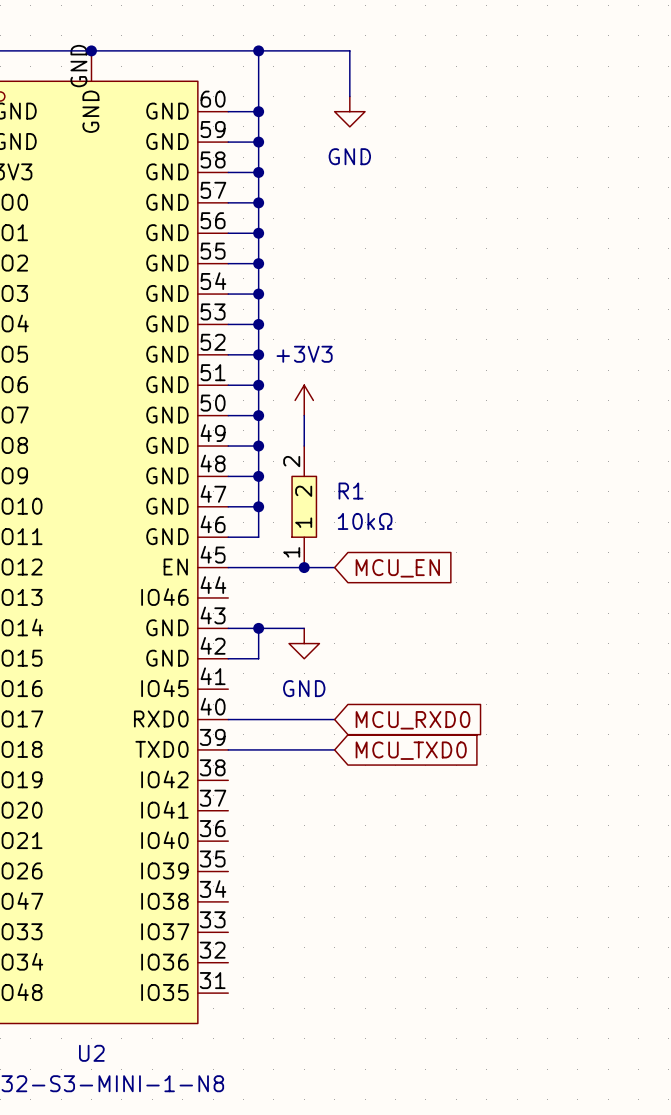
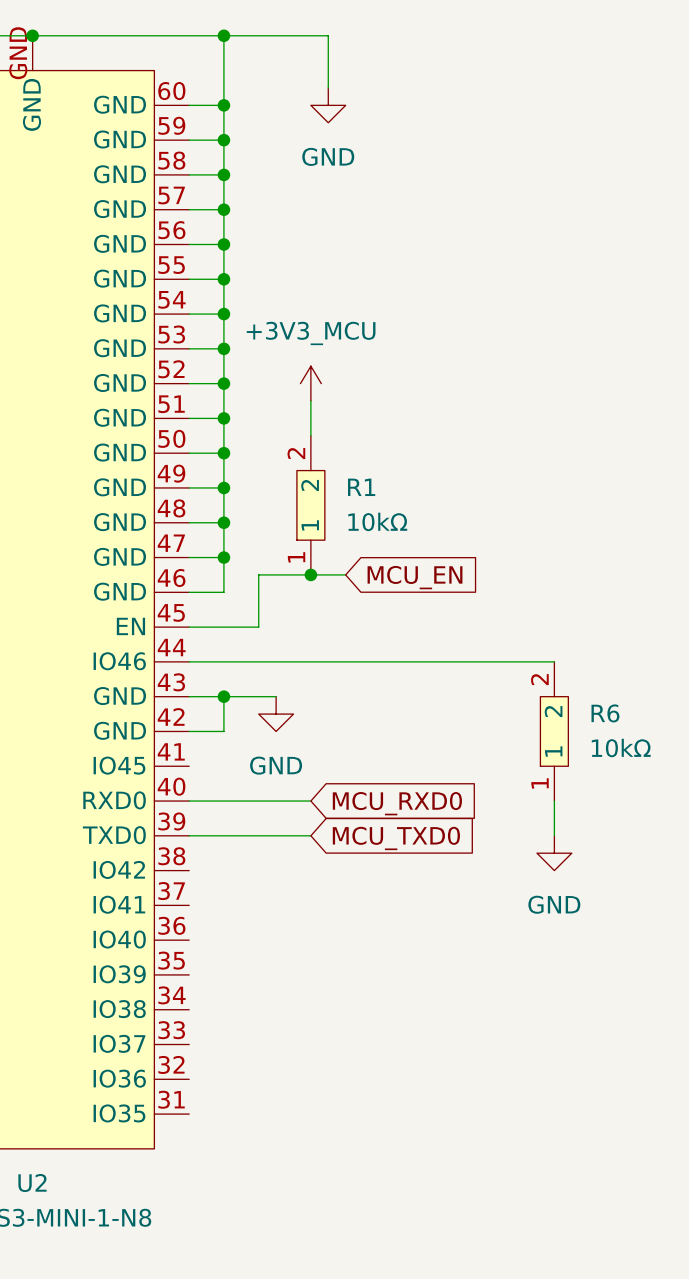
power symbol: none -> +3V3_MCU (310, 383)
power symbol: +3V3 (304, 400) -> none
wire: (304, 415) (304, 446) -> (310, 401) (310, 435)
R1 position: (304, 506) -> (310, 505)
wire: (289, 567) (334, 567) -> (258, 627) (258, 574) (345, 574)
junction position: (304, 567) -> (310, 574)
global label position: MCU_EN (397, 568) -> MCU_EN (415, 577)
wire: none -> (189, 661) (554, 661)
R6: none -> 10kΩ (554, 731)
wire: none -> (554, 801) (554, 835)
power symbol: none -> GND (554, 853)

